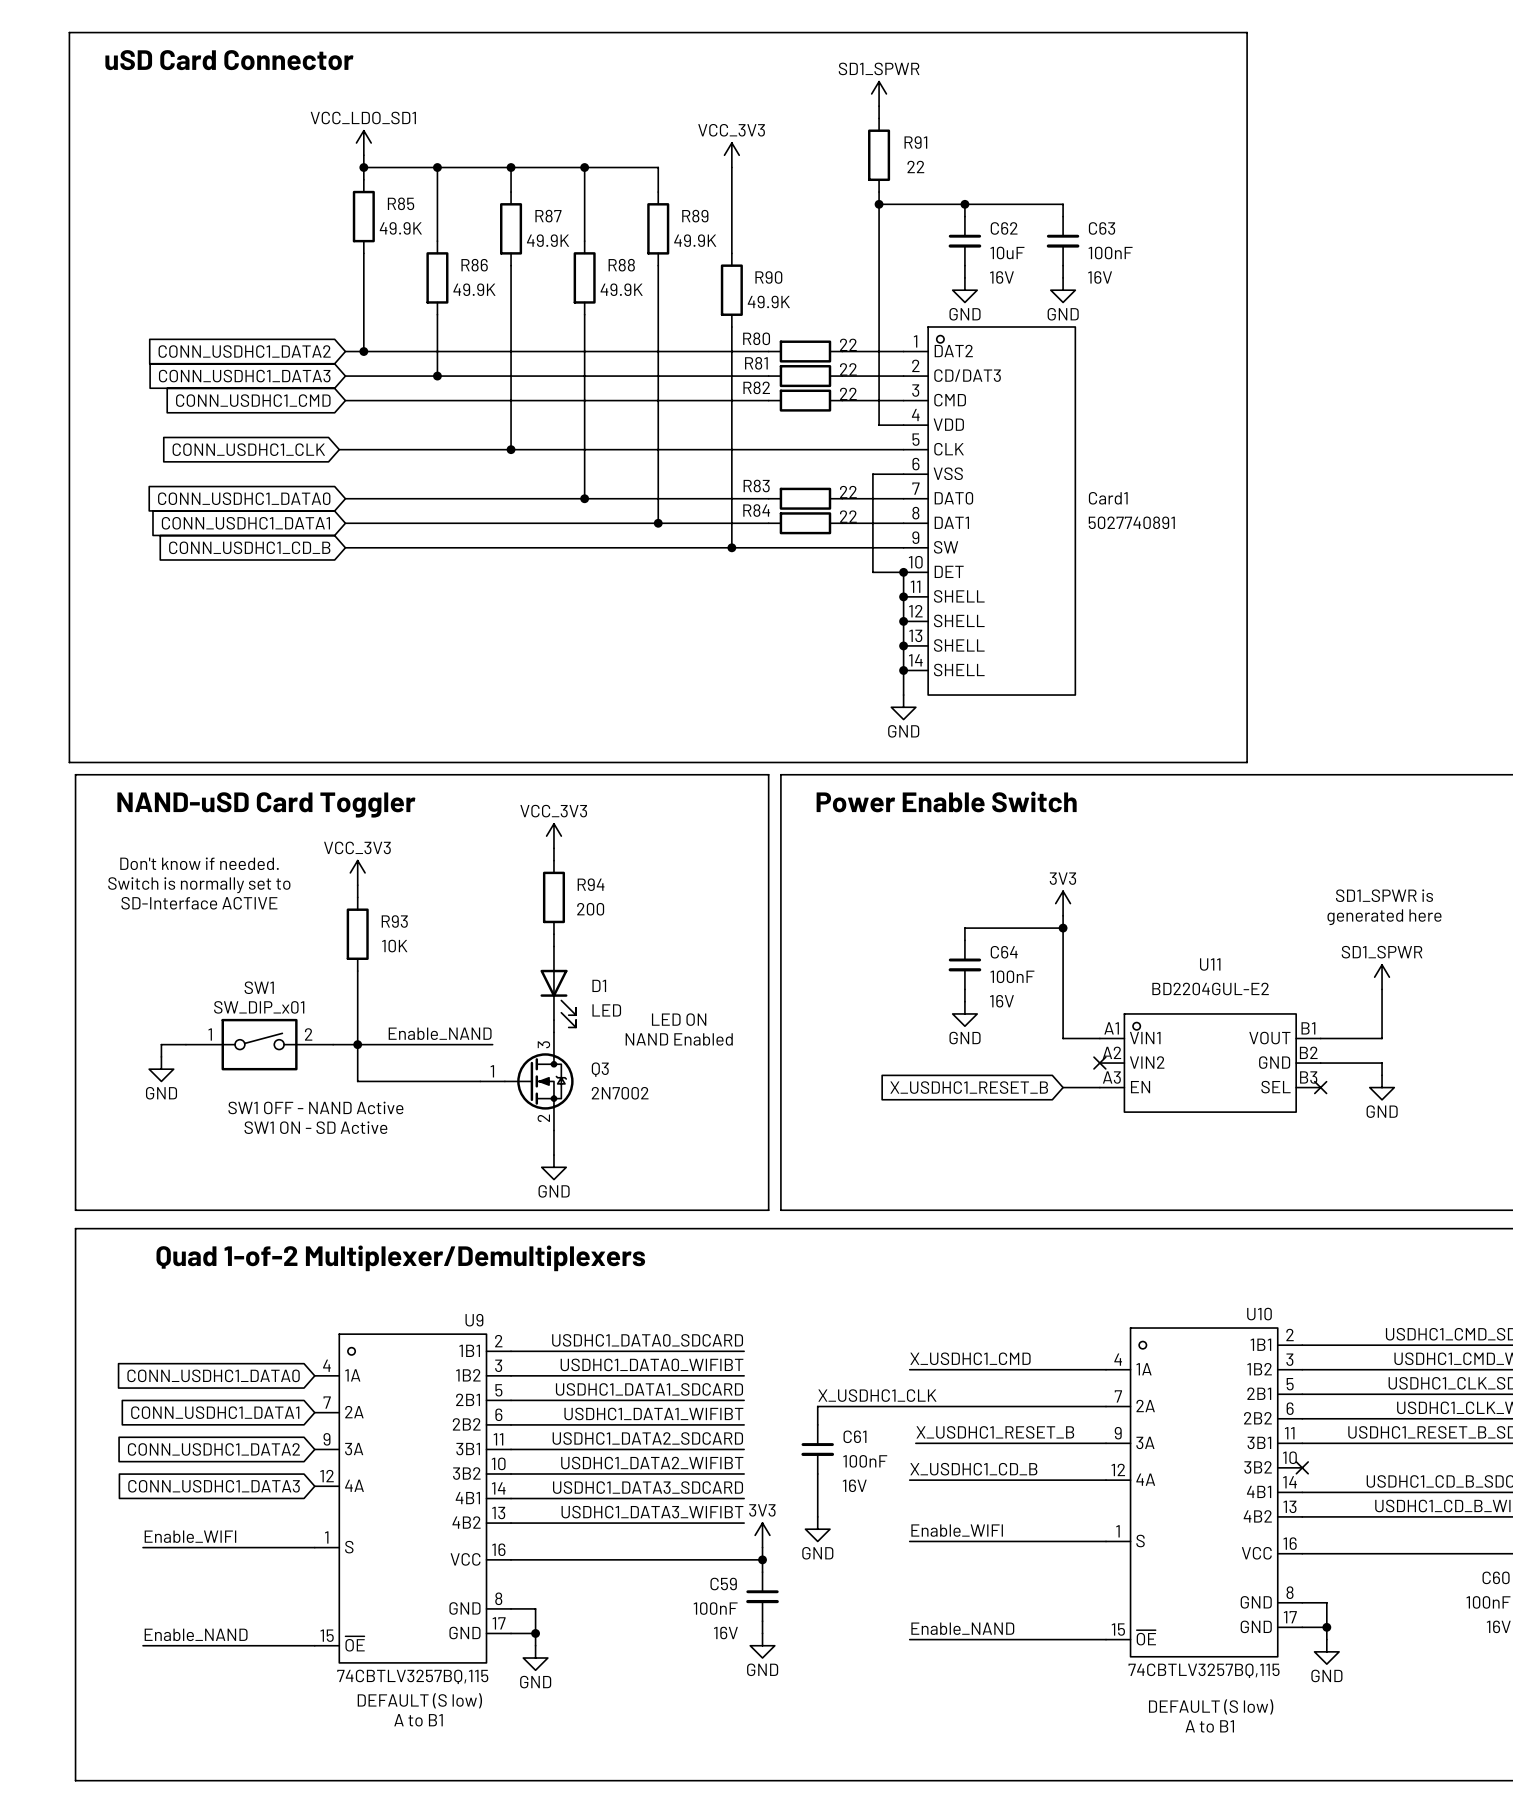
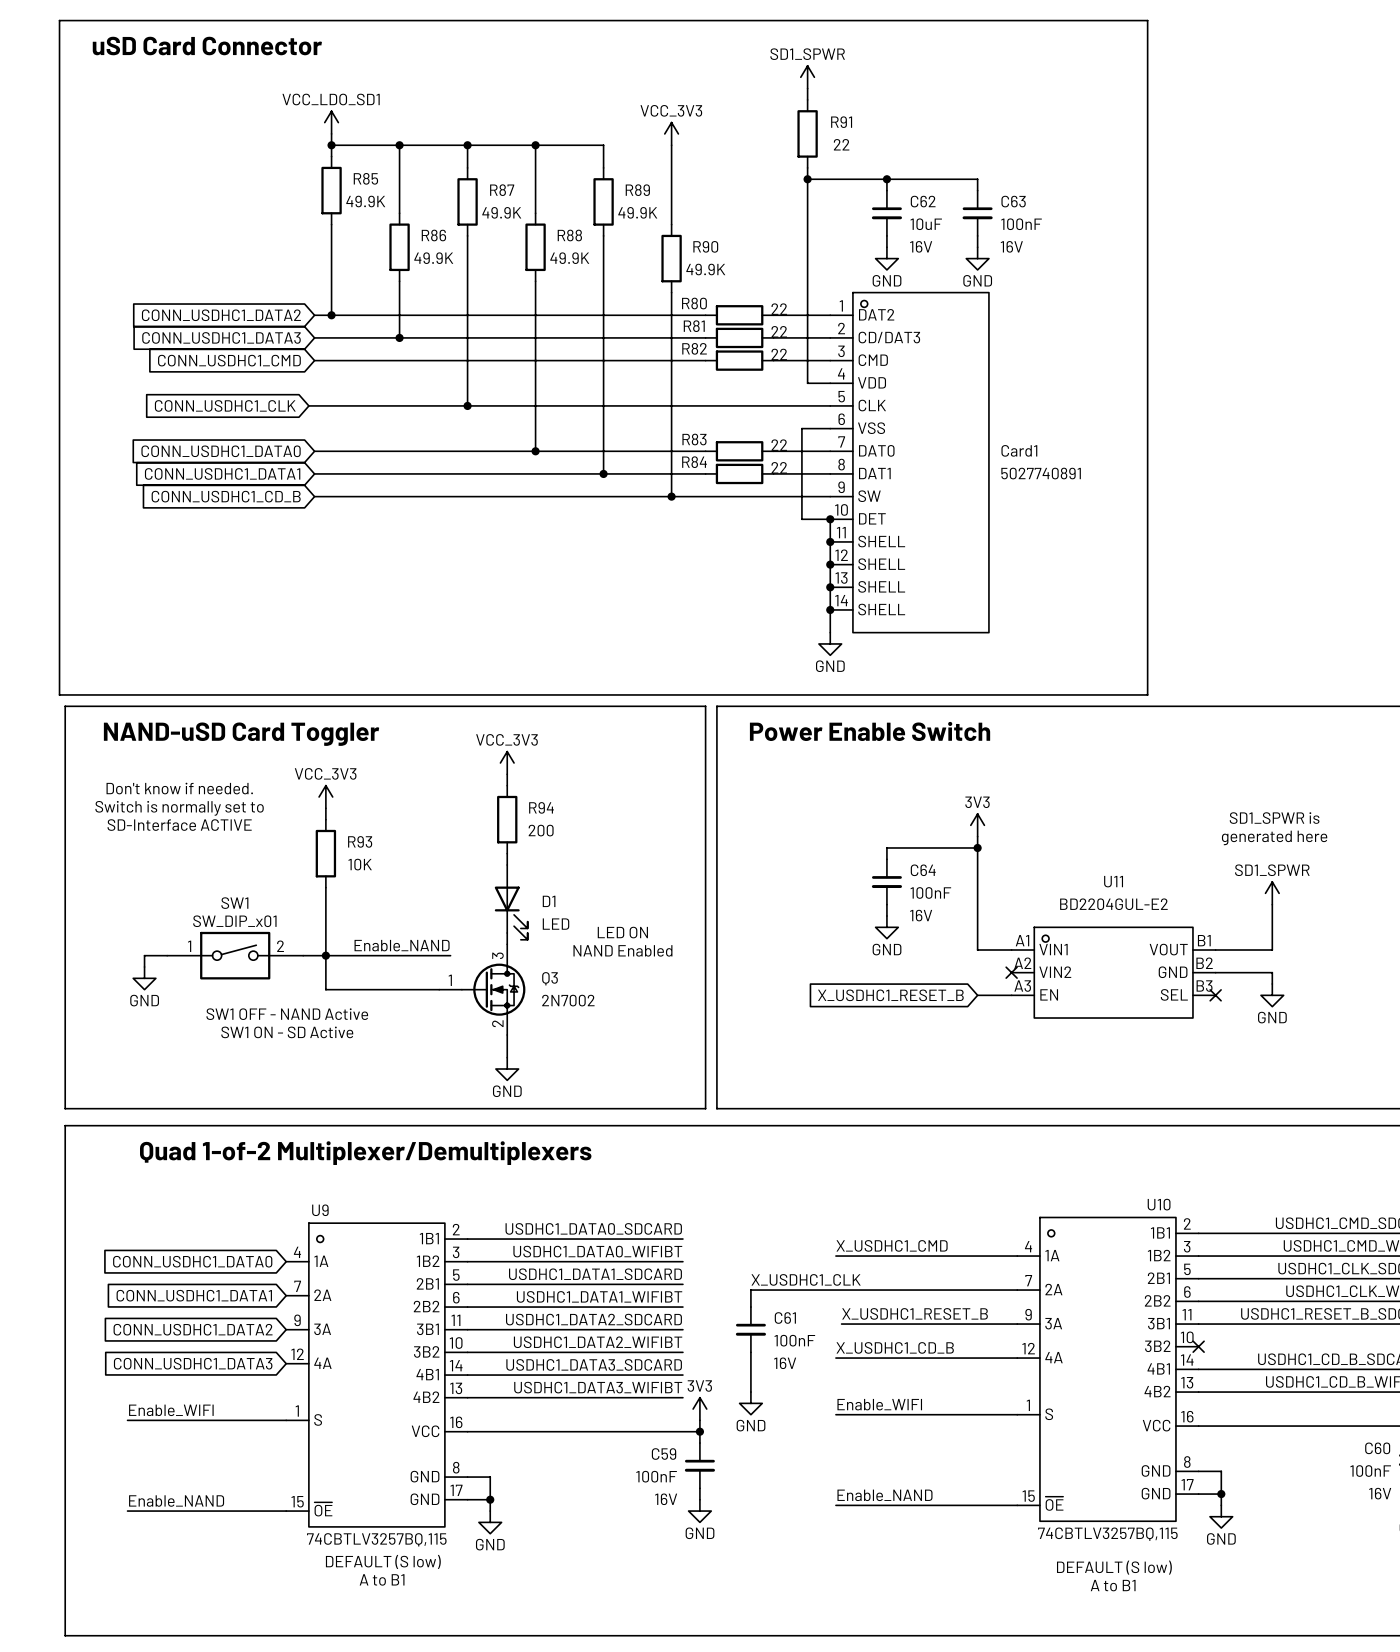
U9 name position: U9 (474, 1320) -> U9 (320, 1210)

